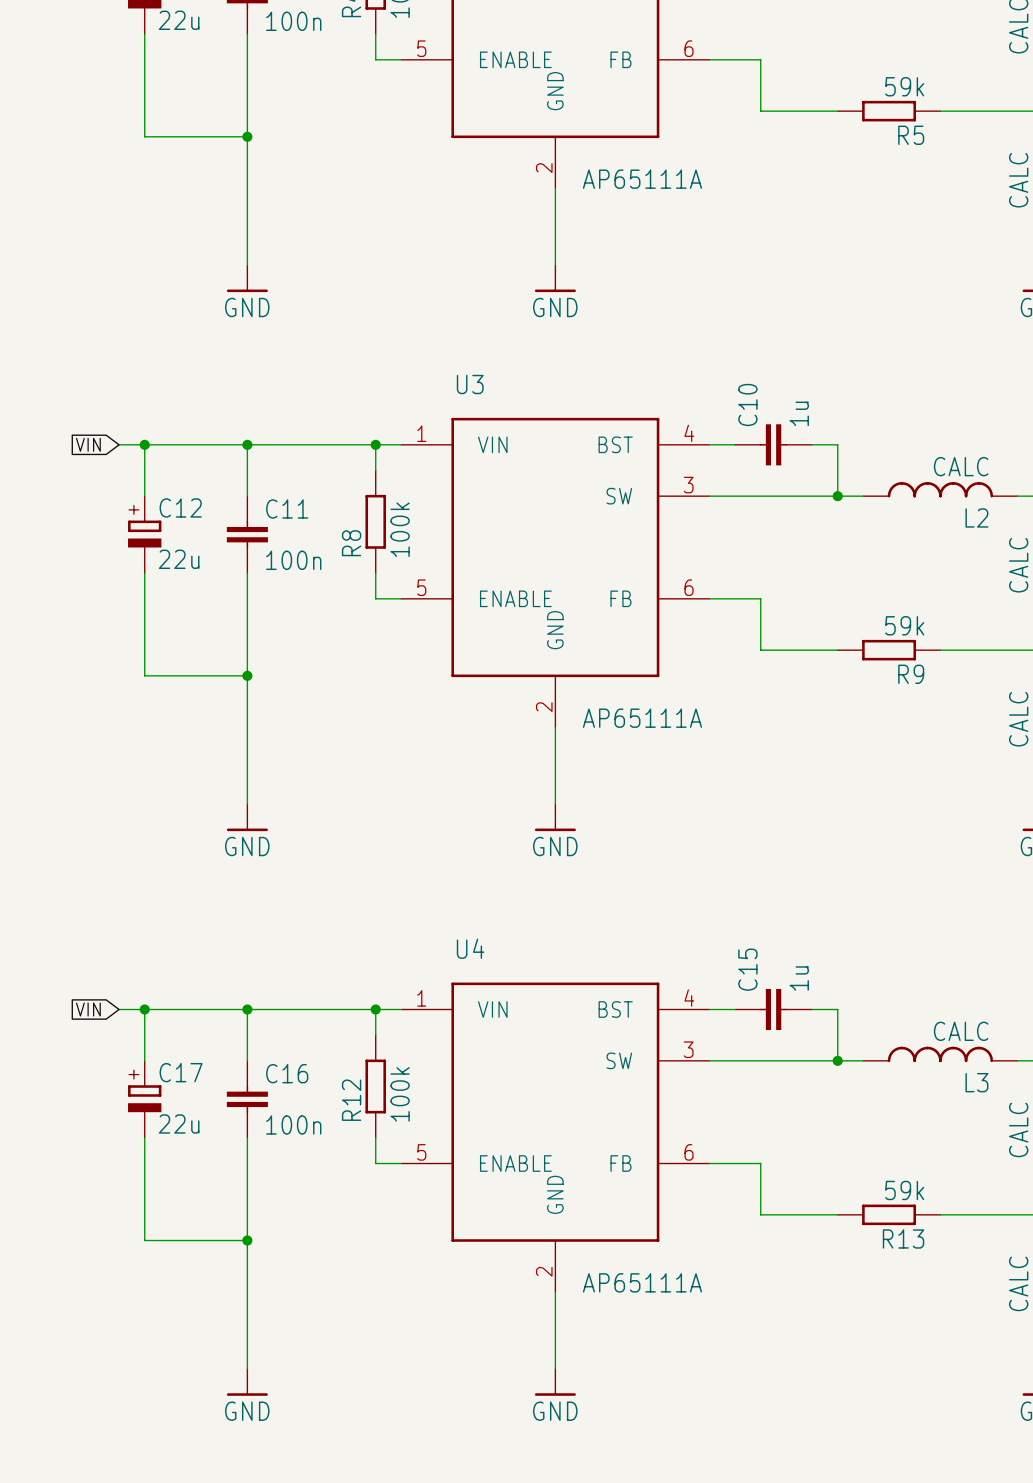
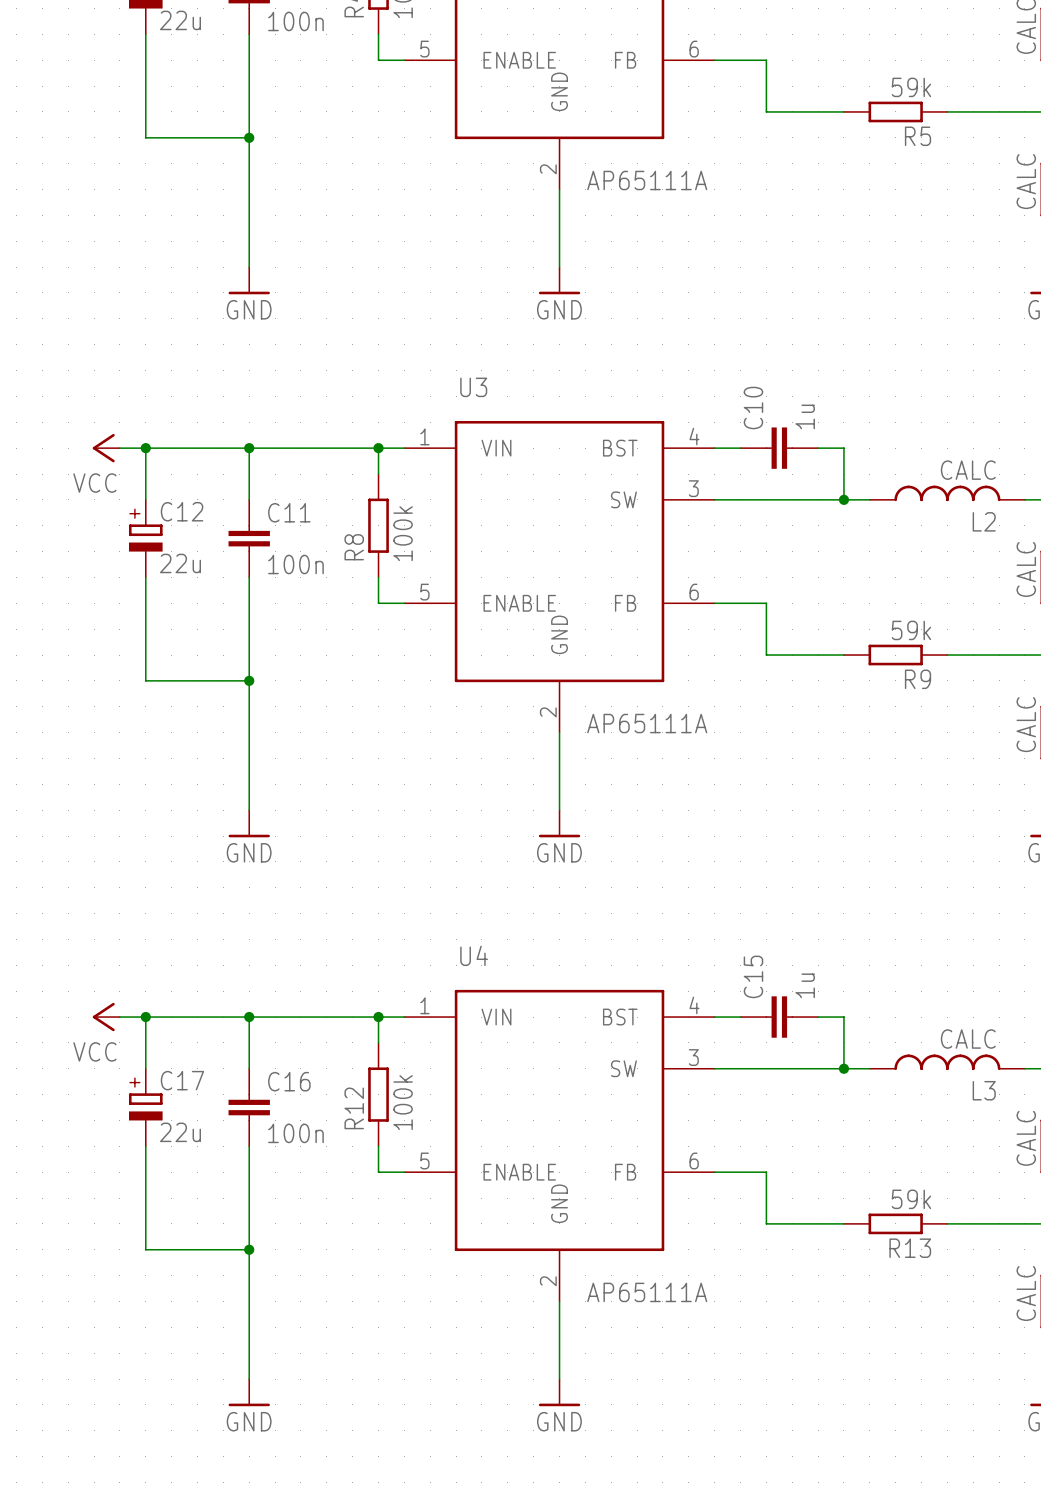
global label: VIN (88, 444) -> none
power symbol: none -> VCC (106, 448)
global label: VIN (88, 1009) -> none
power symbol: none -> VCC (106, 1017)

